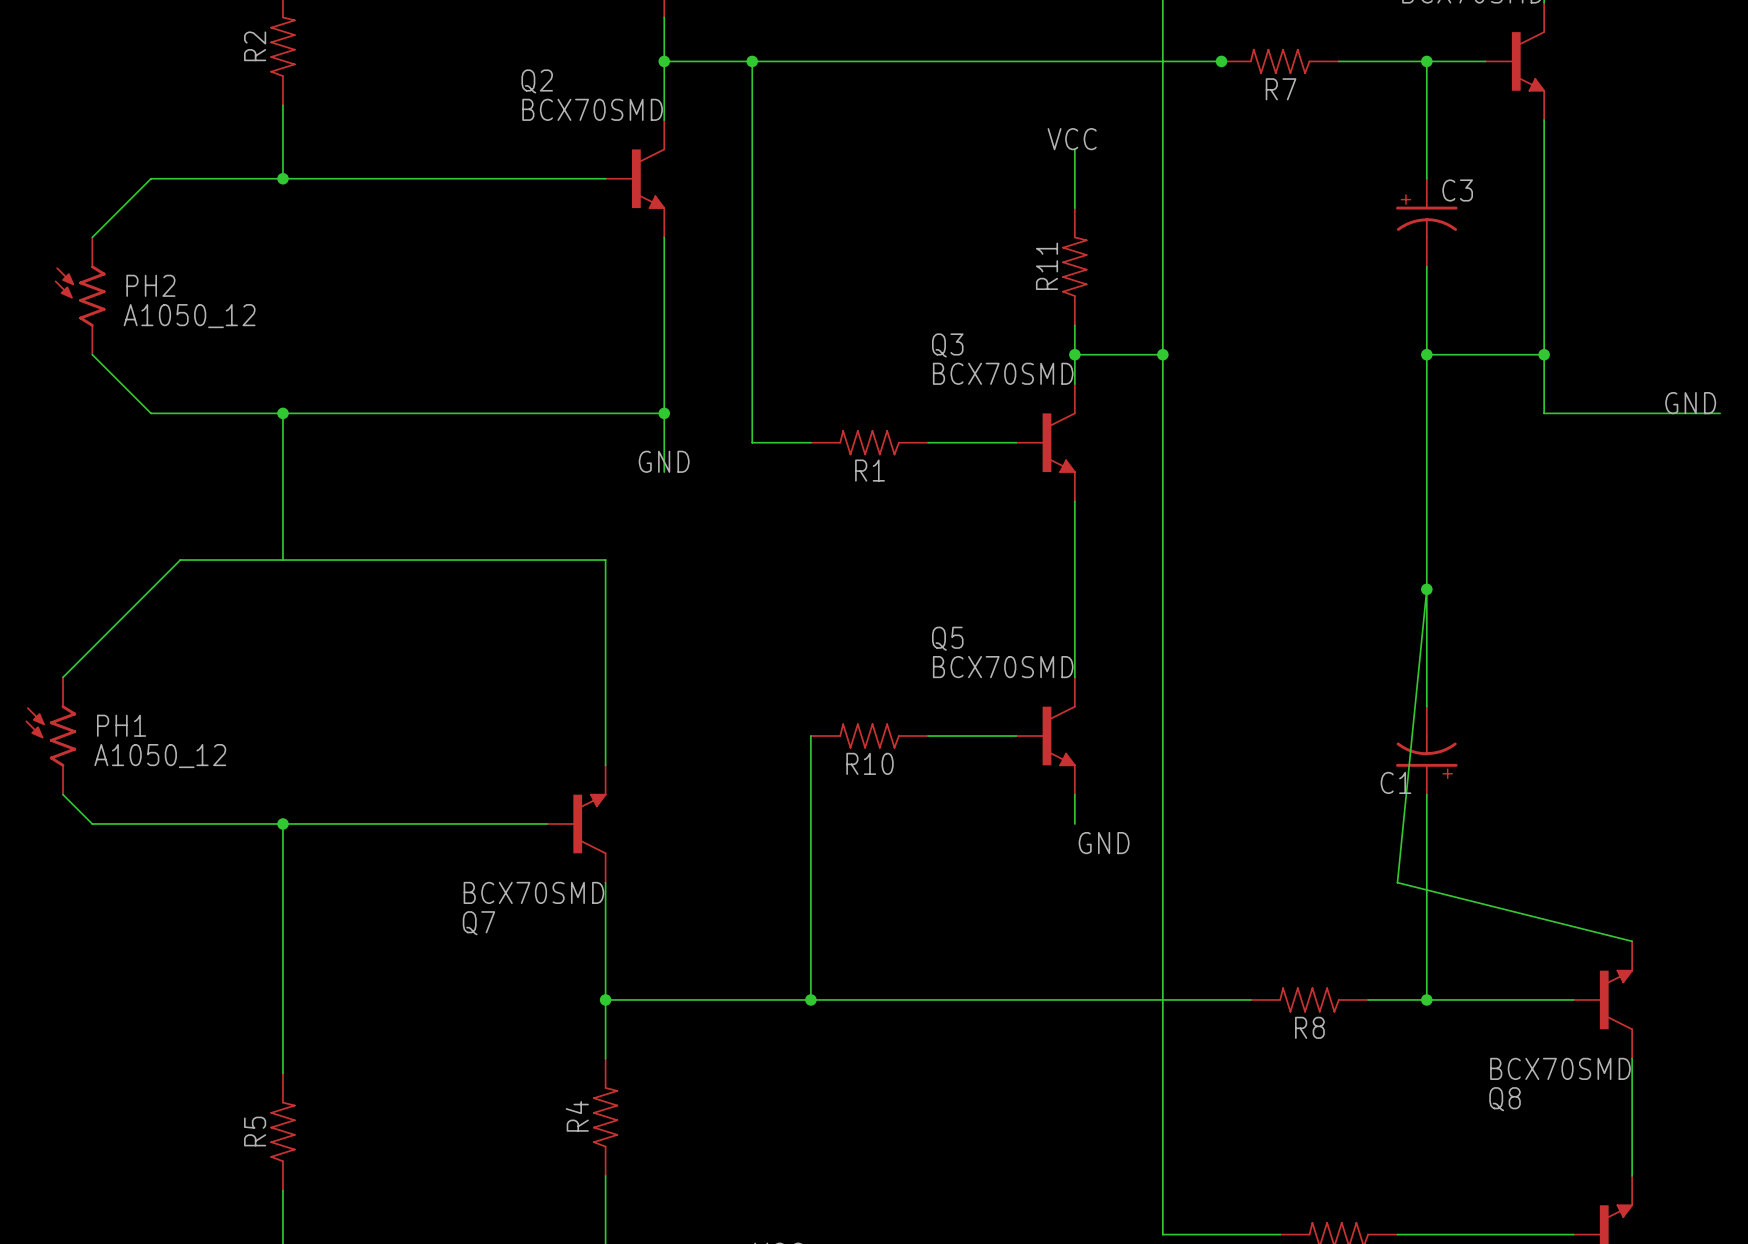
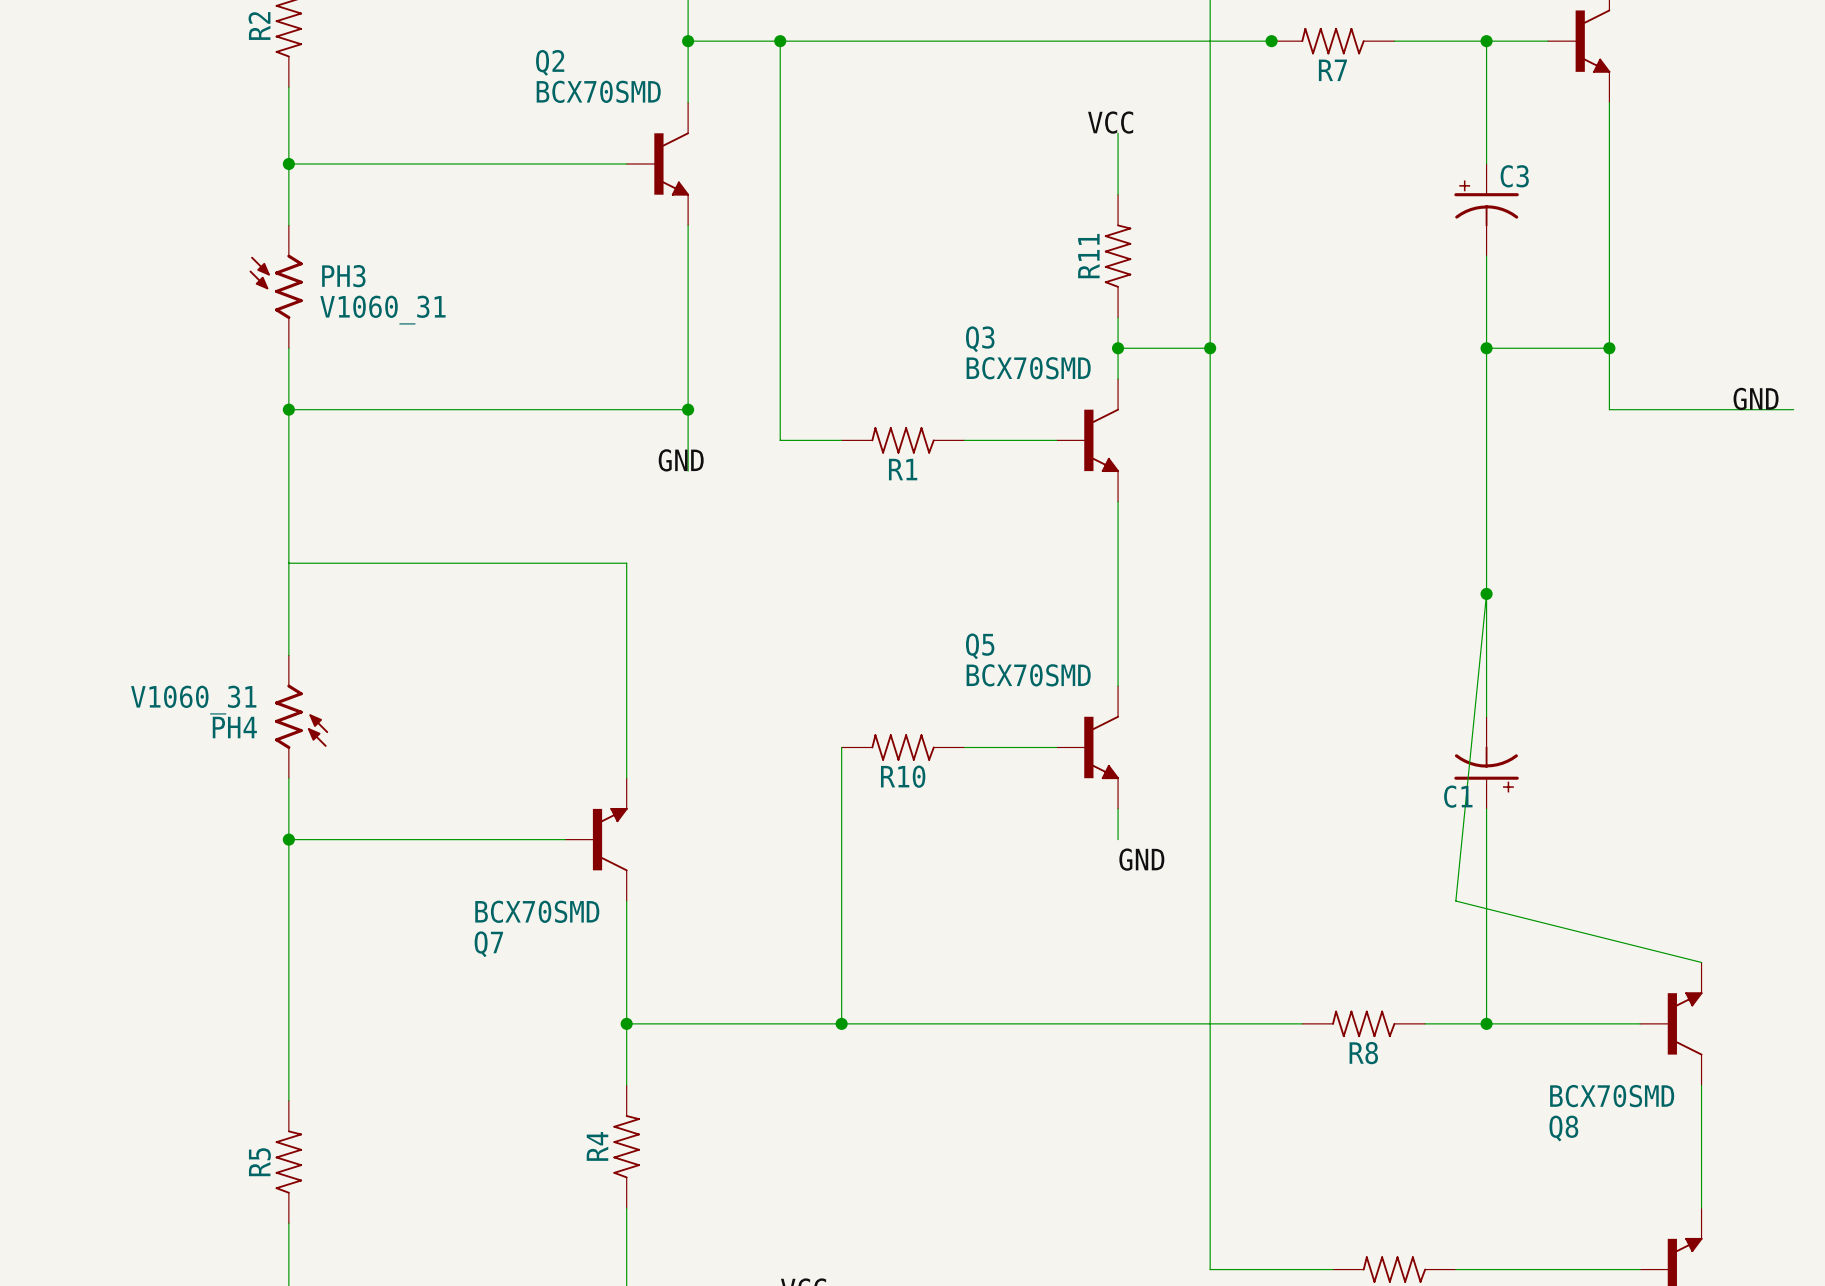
wire: (282, 178) (150, 178) (92, 237) -> (288, 163) (288, 225)
PH2: A1050_12 (80, 296) -> none
PH3: none -> V1060_31 (276, 286)
wire: (92, 354) (150, 413) (282, 413) -> (288, 348) (288, 409)
wire: (282, 560) (180, 560) (63, 677) -> (288, 563) (288, 655)
PH4: none -> V1060_31 (301, 716)
PH1: A1050_12 (50, 736) -> none
wire: (63, 794) (92, 823) (282, 823) -> (288, 778) (288, 839)

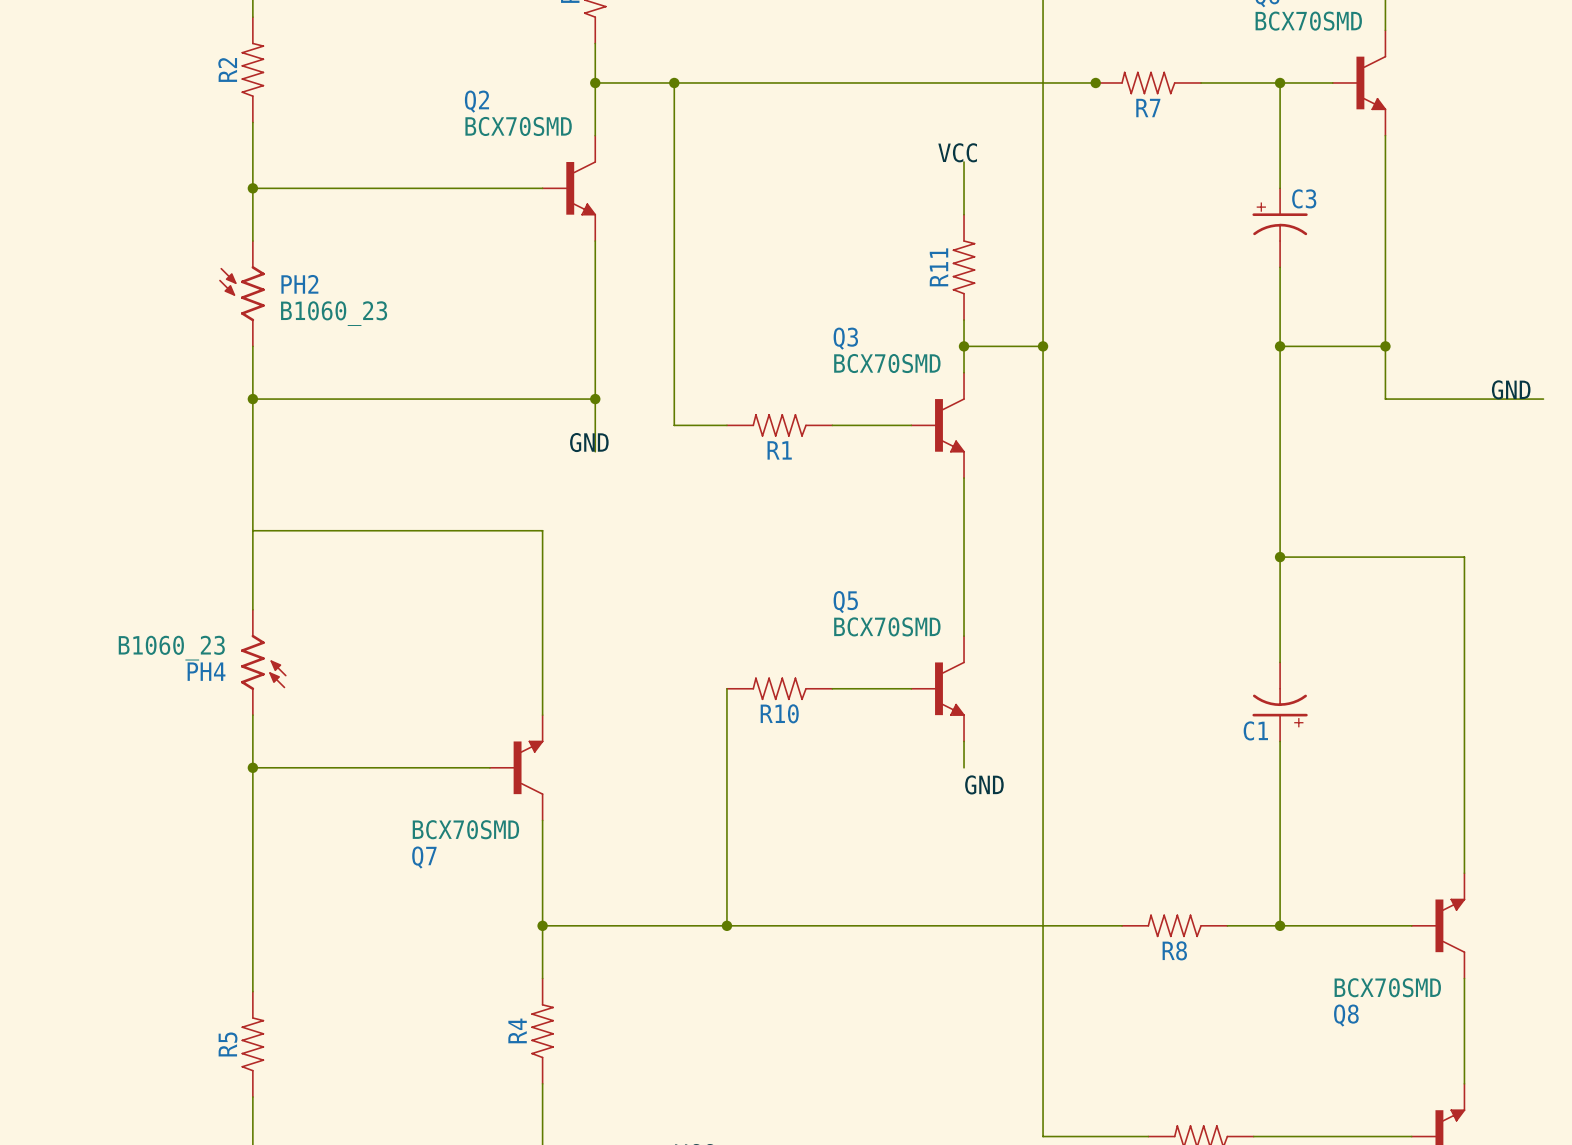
PH3 name: PH3 (343, 276) -> PH2 (299, 284)
PH3 value: V1060_31 (382, 310) -> B1060_23 (334, 313)
wire: (1486, 593) (1455, 901) (1701, 962) -> (1280, 557) (1464, 557) (1464, 873)
PH4 value: V1060_31 (193, 700) -> B1060_23 (171, 648)

